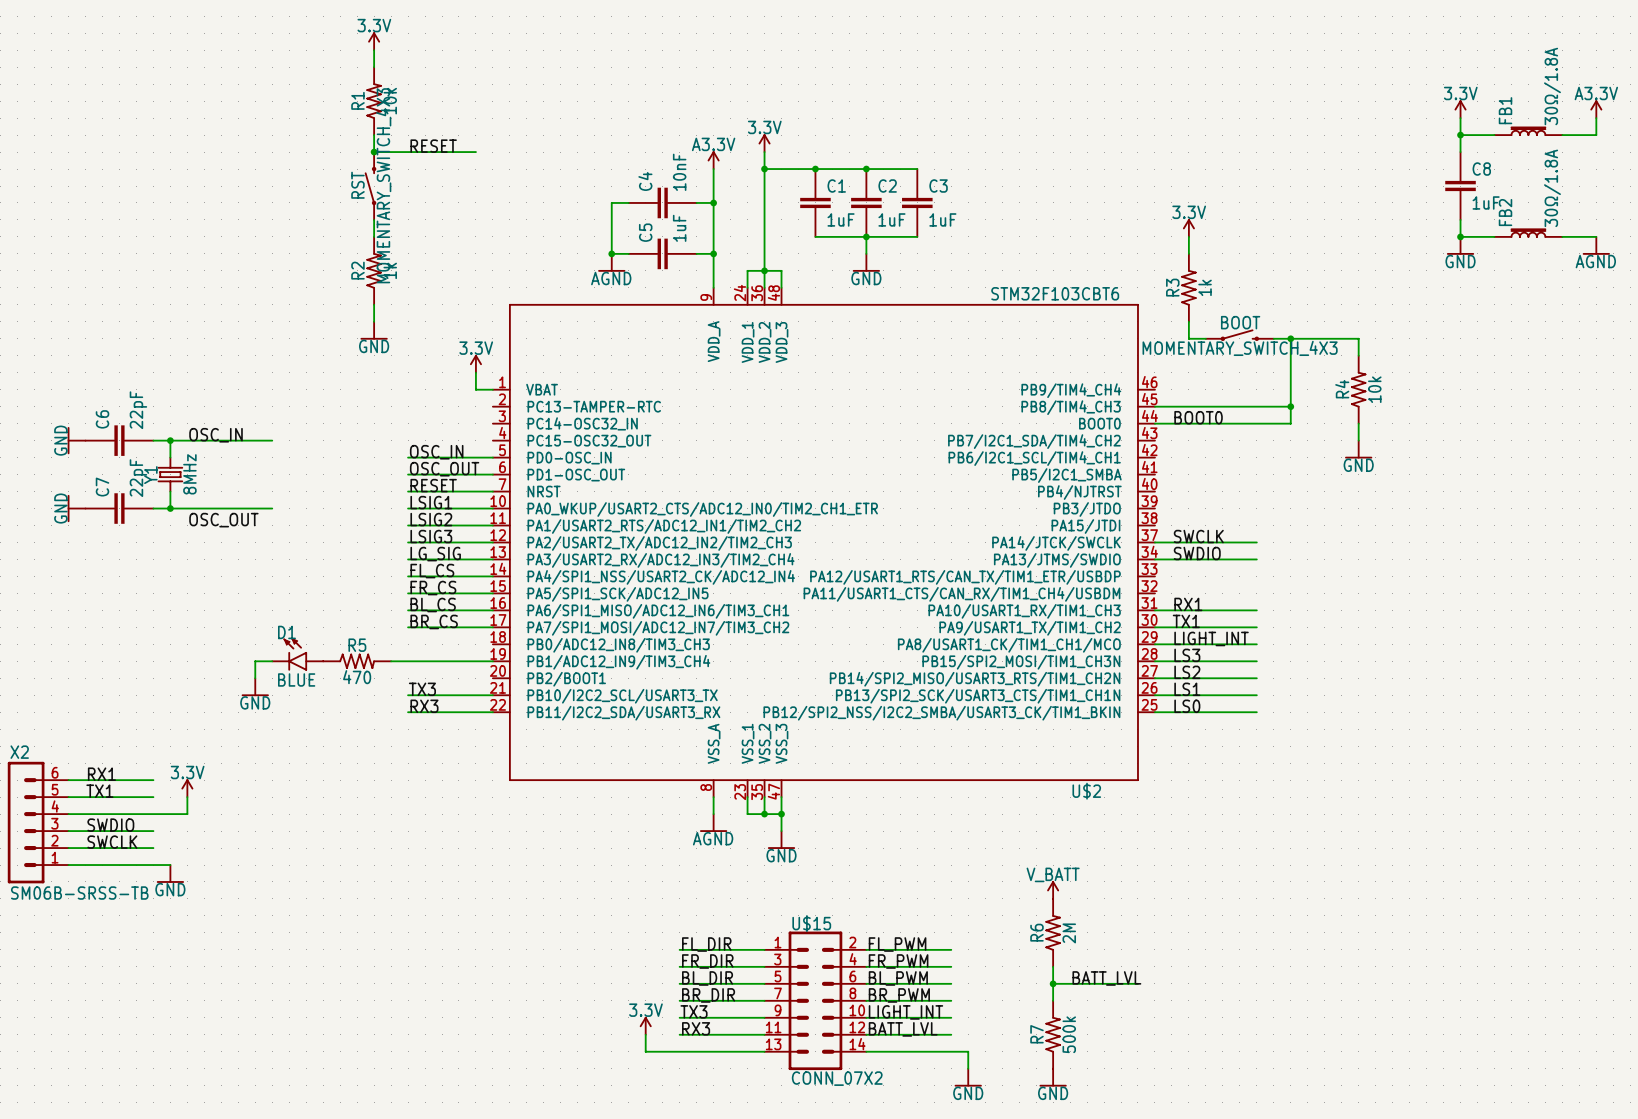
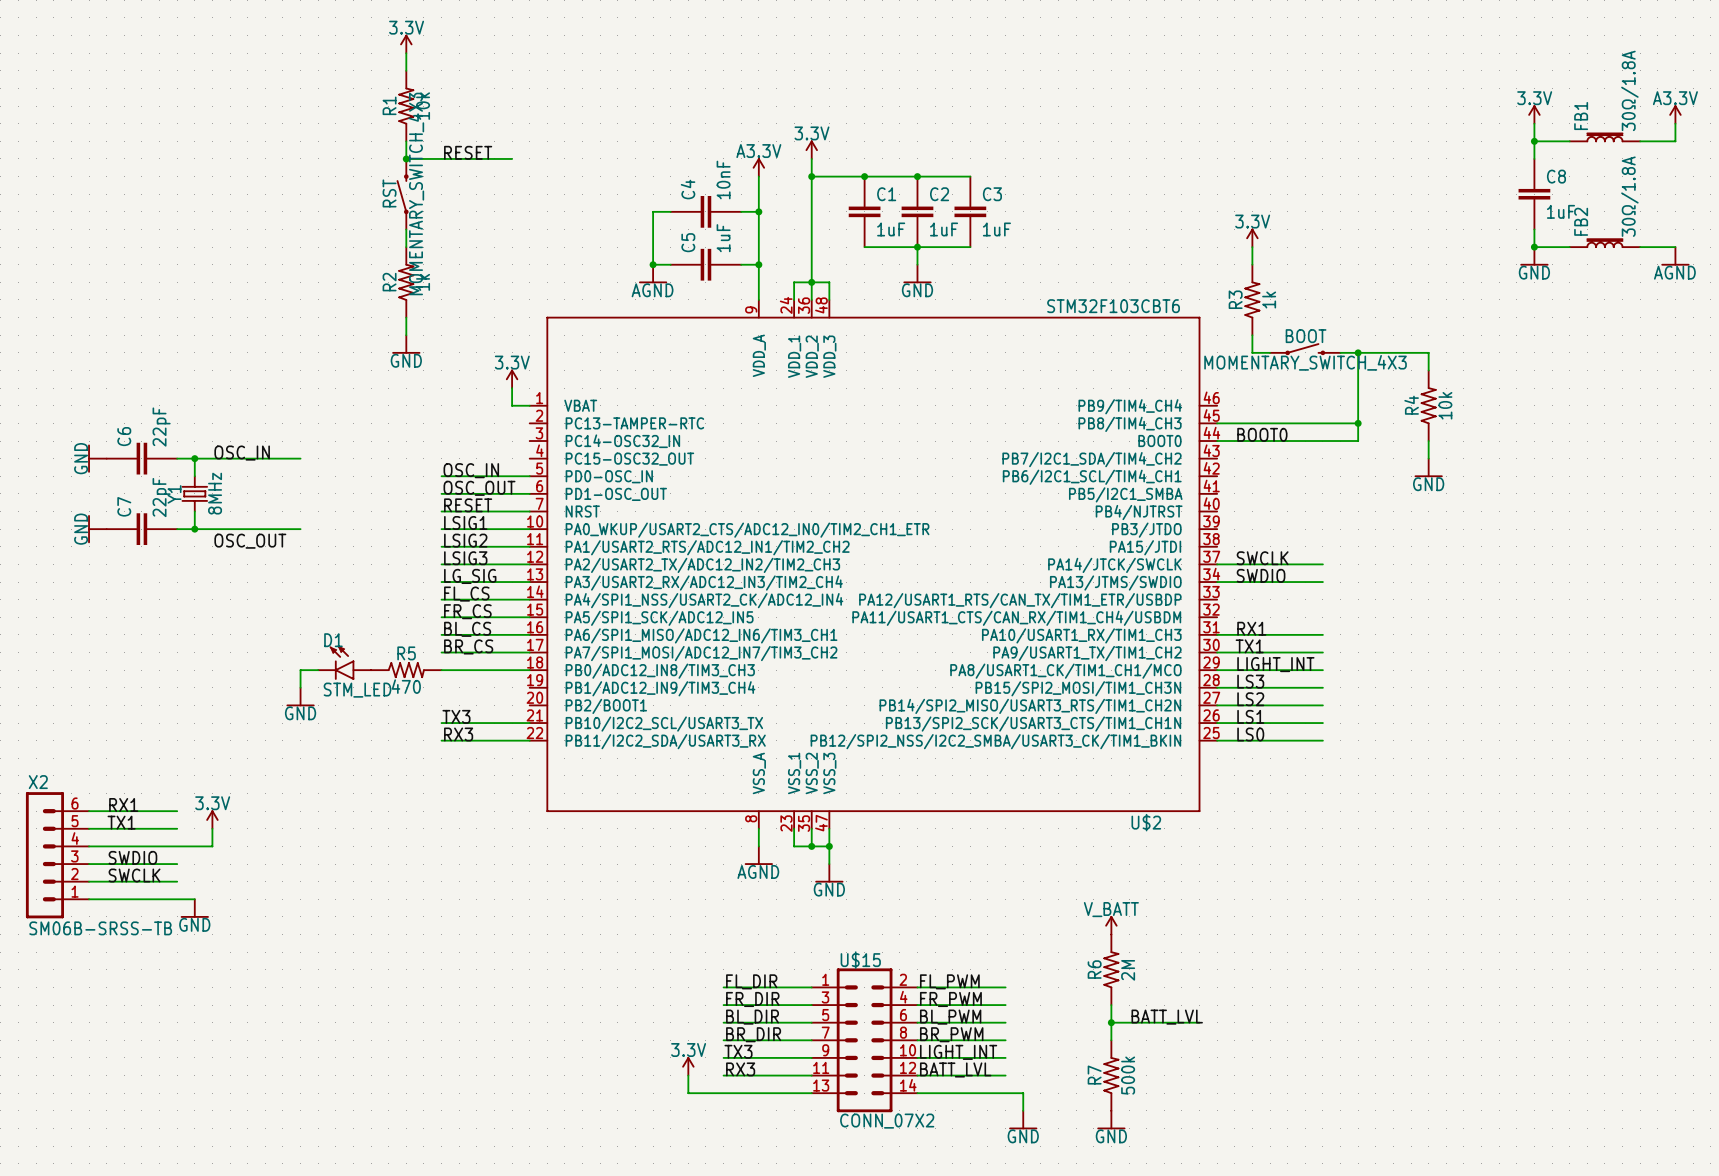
wire: none -> (441, 670) (529, 670)
D1 position: (297, 654) -> (344, 662)
wire: (272, 661) (255, 661) (255, 678) -> (300, 687) (300, 670) (318, 670)
R5 position: (357, 661) -> (406, 670)
wire: (391, 661) (492, 661) -> none
D1 value: BLUE (296, 679) -> STM_LED (357, 690)
power symbol position: GND (255, 687) -> GND (300, 697)

